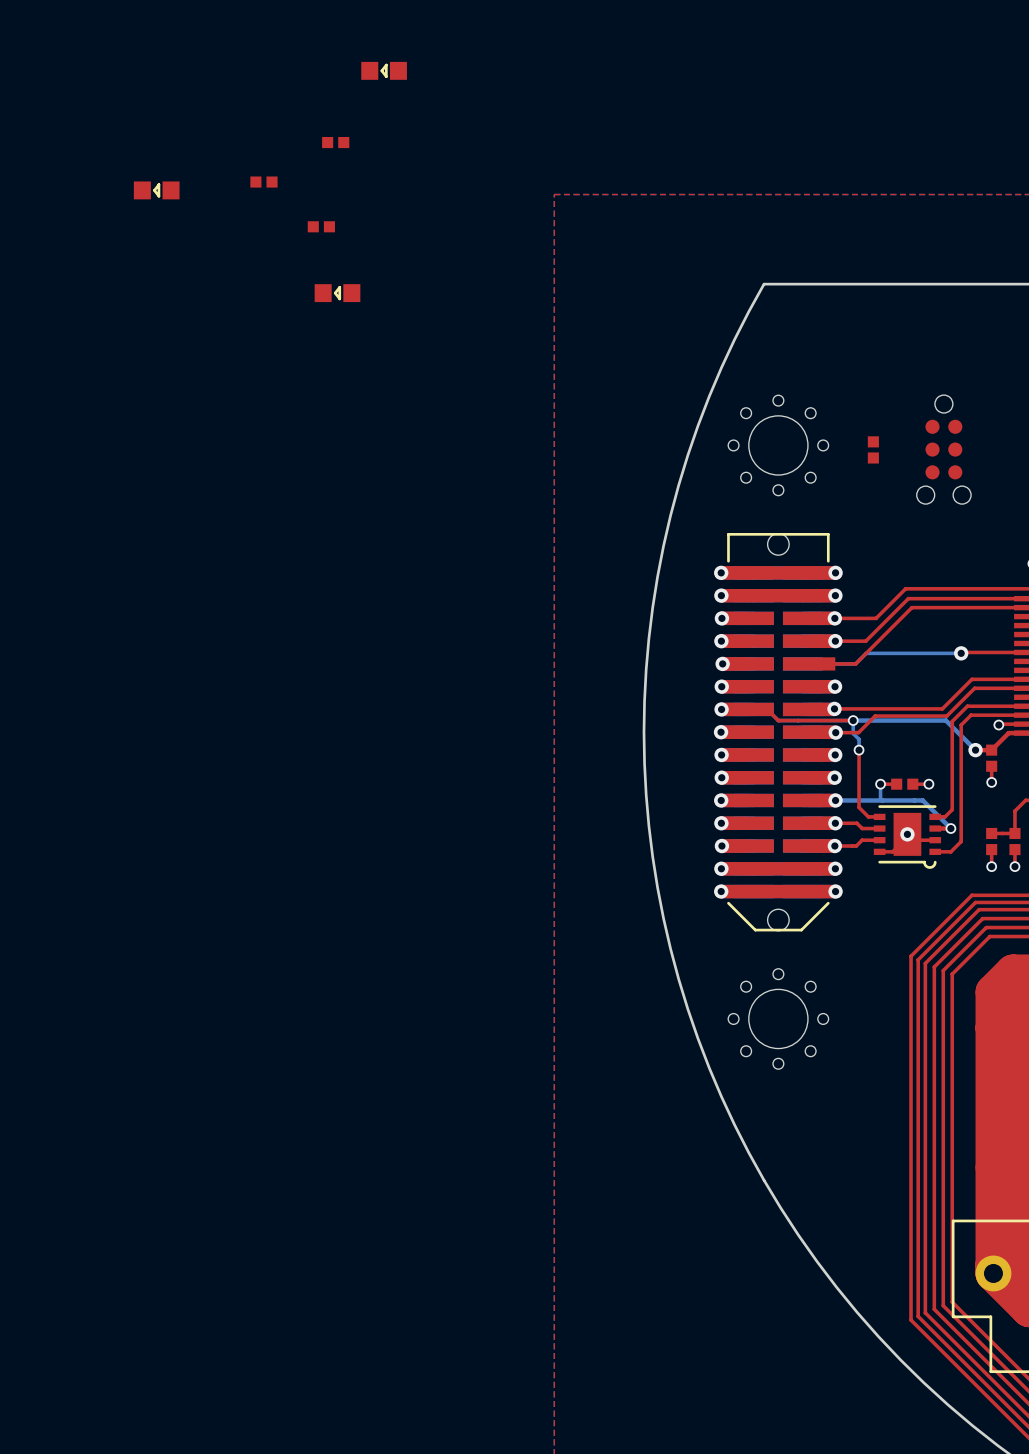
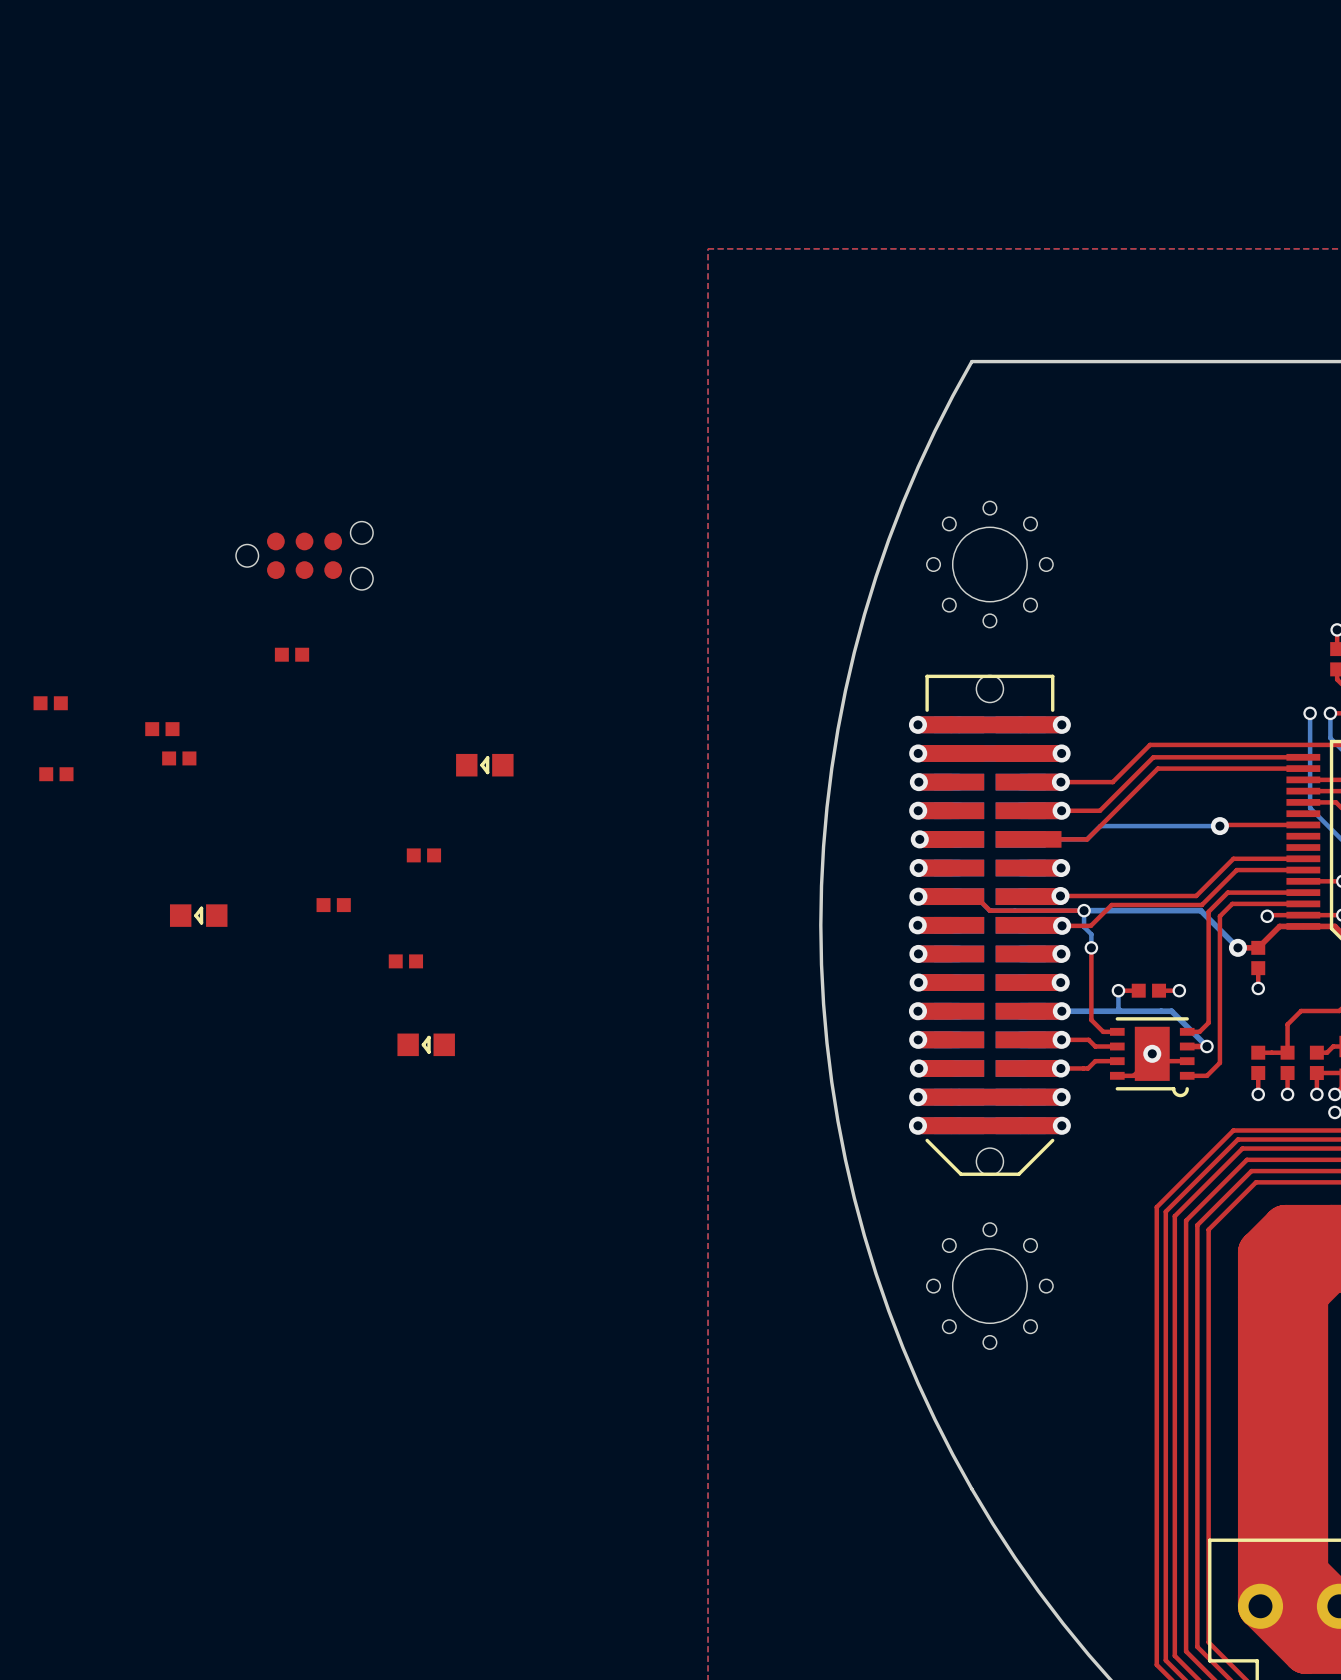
part: (384, 70) -> none
part: (335, 142) -> none
part: (263, 182) -> none
part: (156, 190) -> none
part: (321, 226) -> none
part: (337, 293) -> none
part: none -> (304, 555)
part: (873, 449) -> none
part: (943, 449) -> none
part: none -> (292, 654)
part: none -> (50, 703)
part: none -> (162, 729)
part: none -> (179, 758)
part: none -> (484, 765)
part: none -> (56, 774)
part: none -> (423, 855)
part: none -> (333, 905)
part: none -> (198, 915)
part: none -> (405, 961)
part: none -> (426, 1044)

